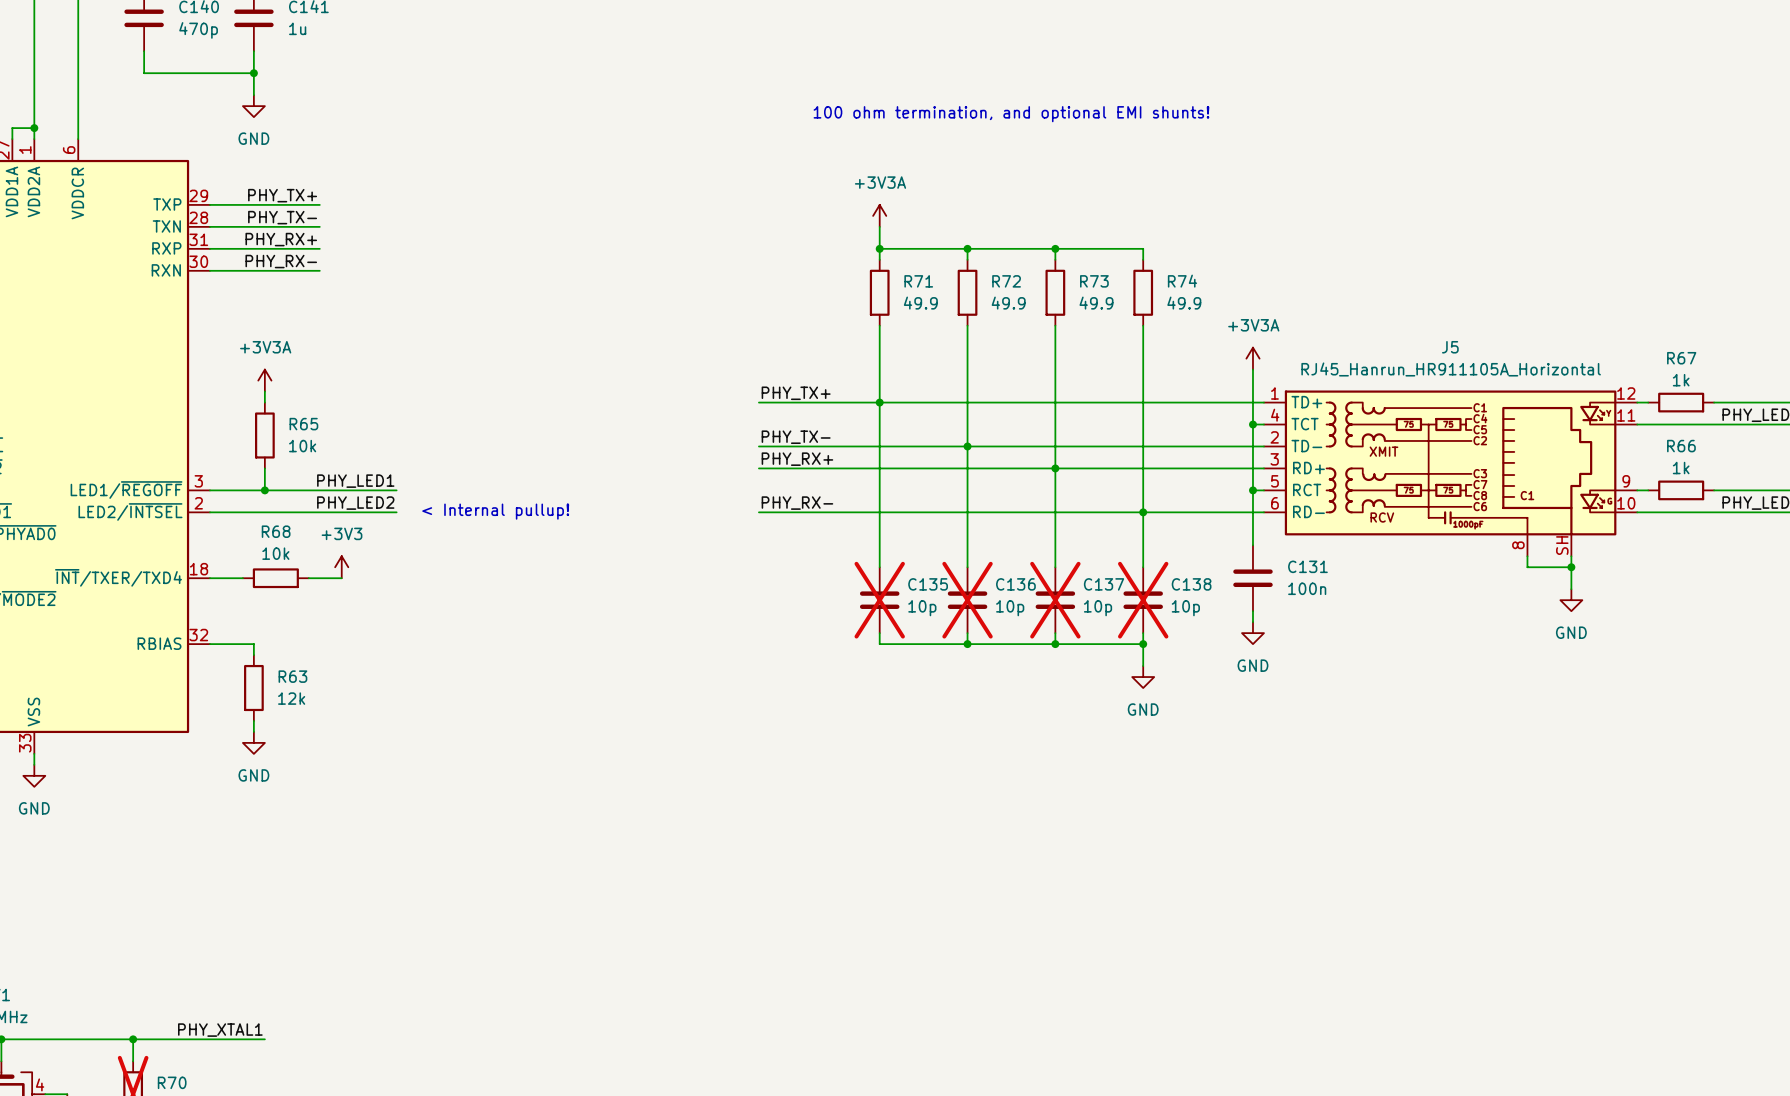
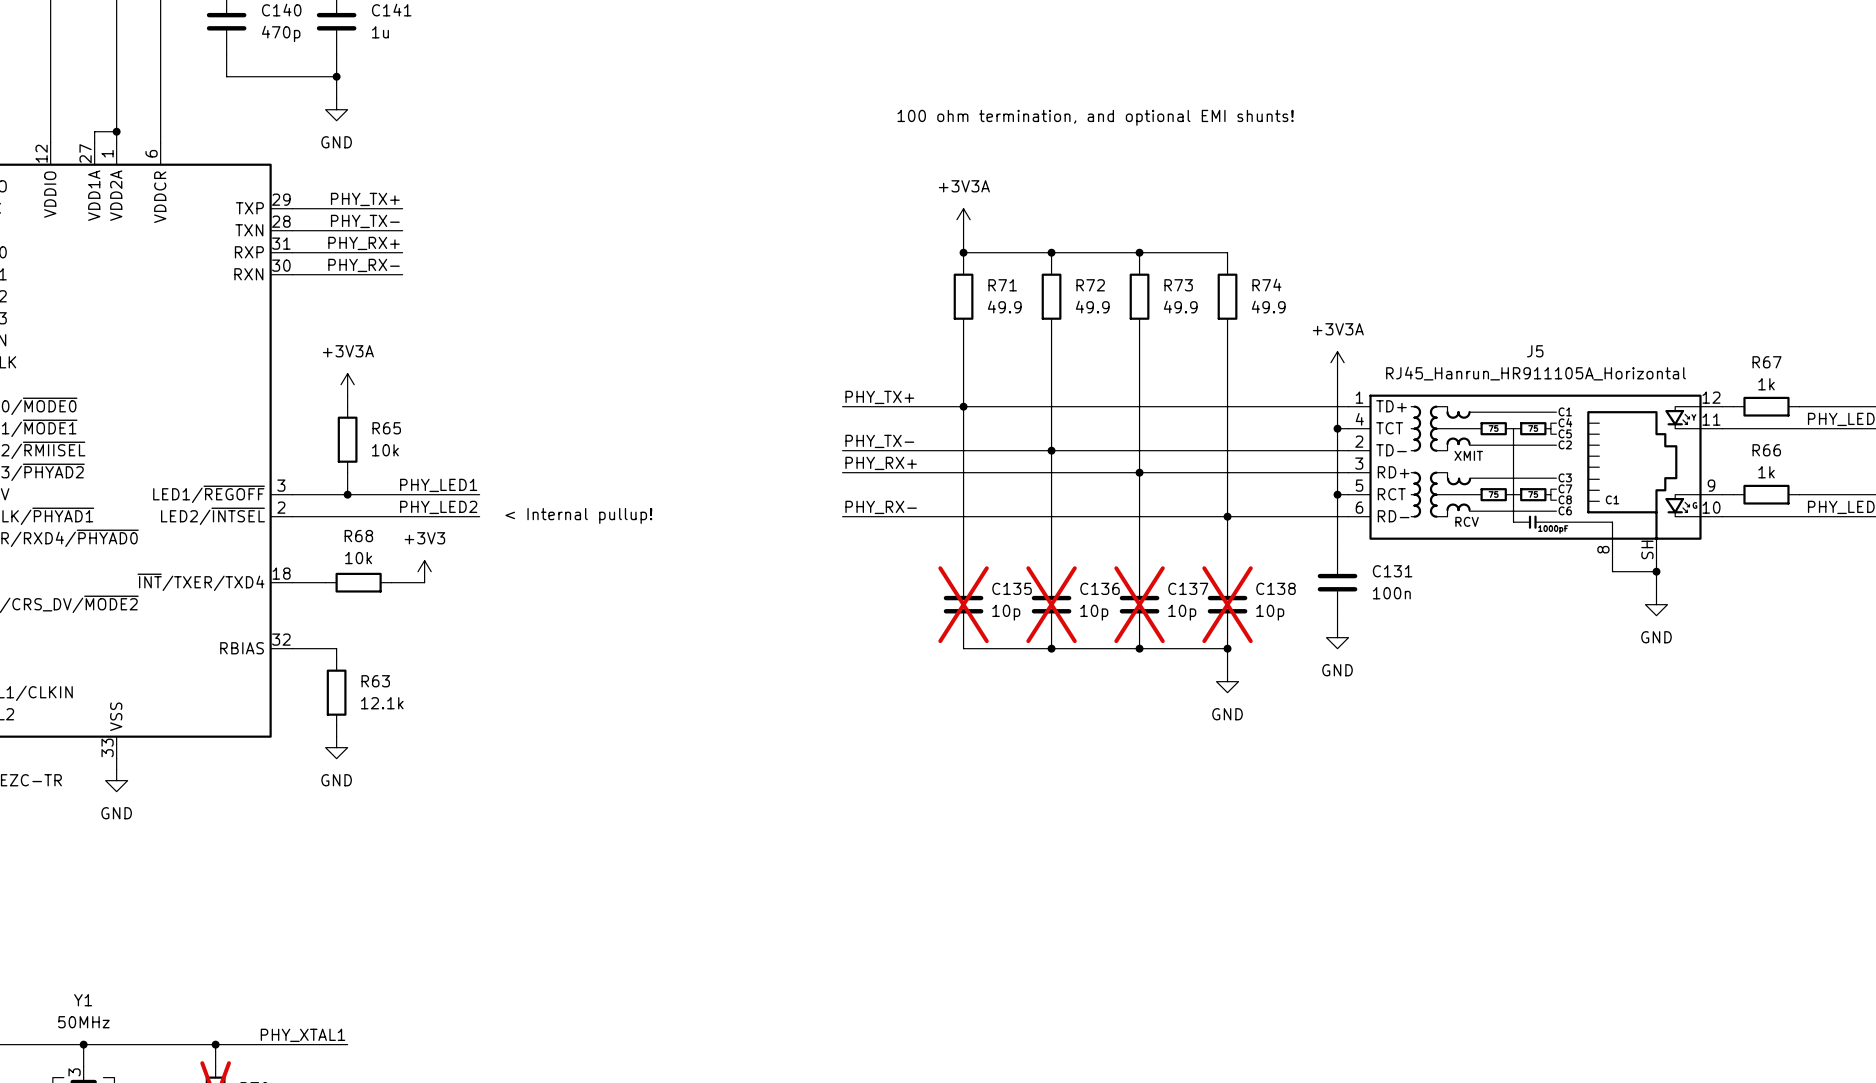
R63 value: 12k (291, 698) -> 12.1k (382, 703)

